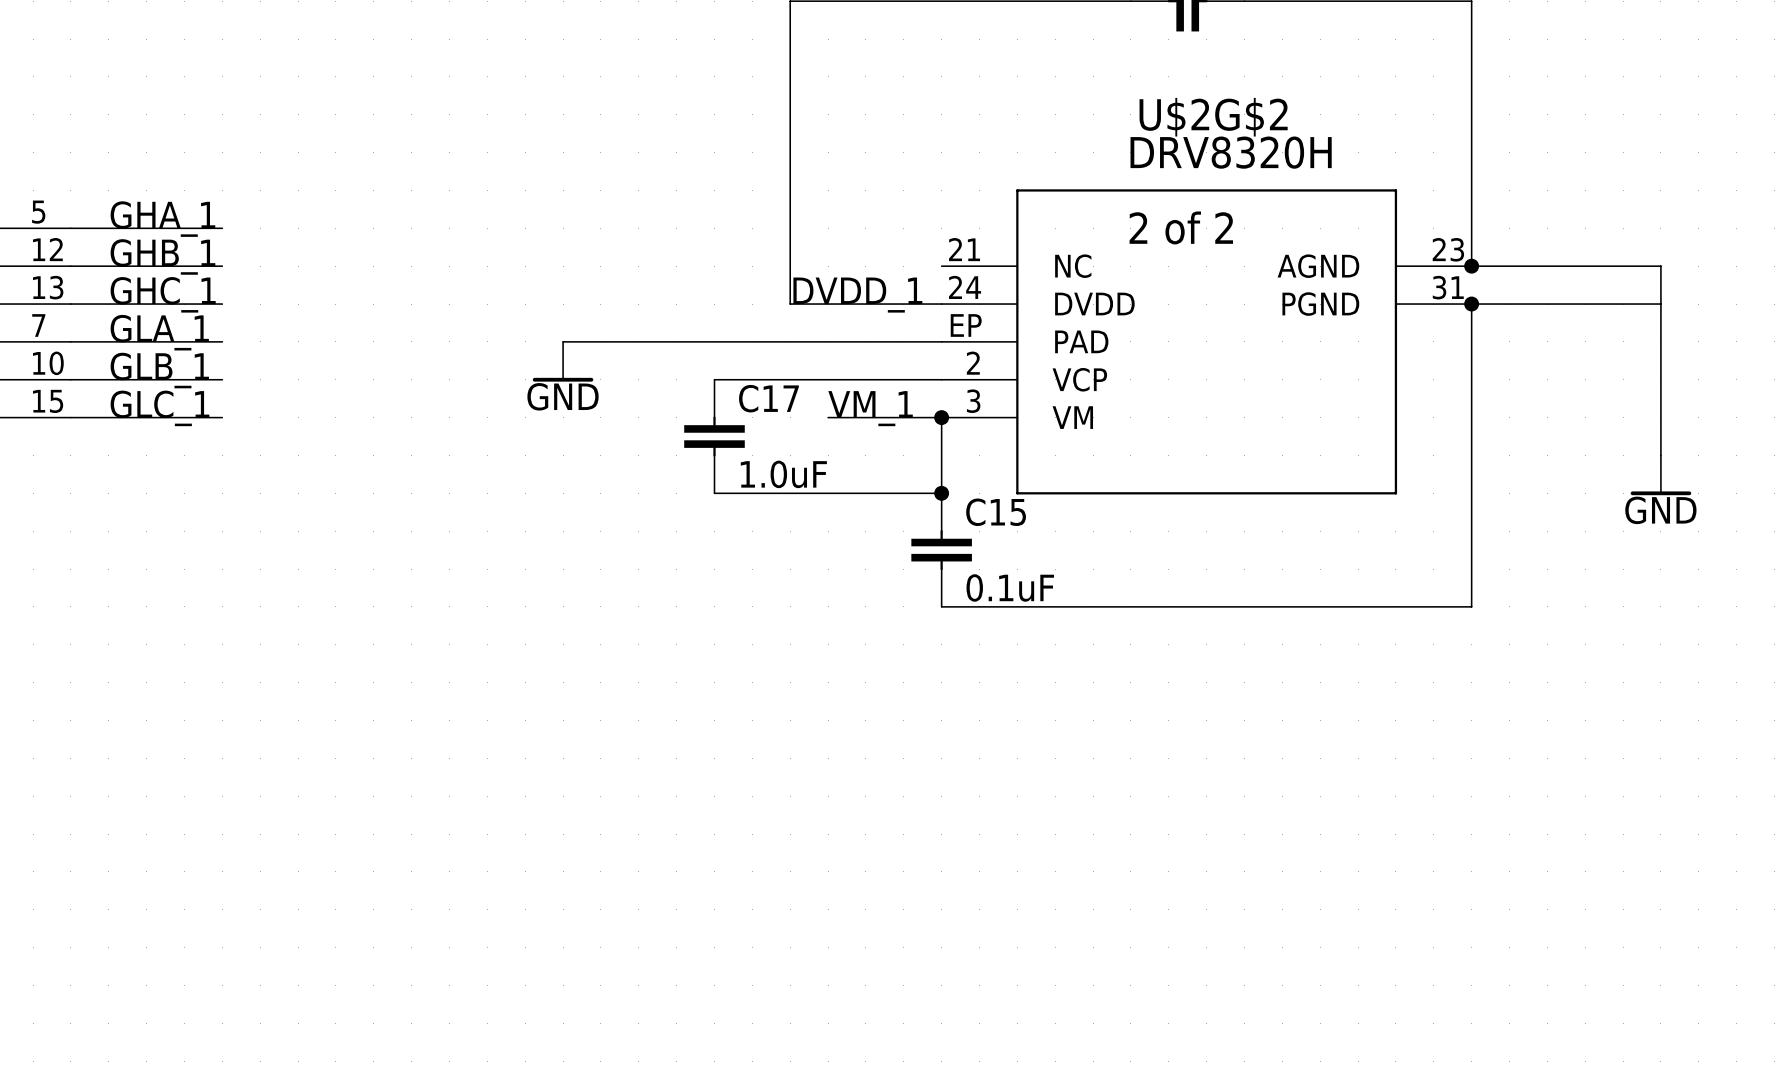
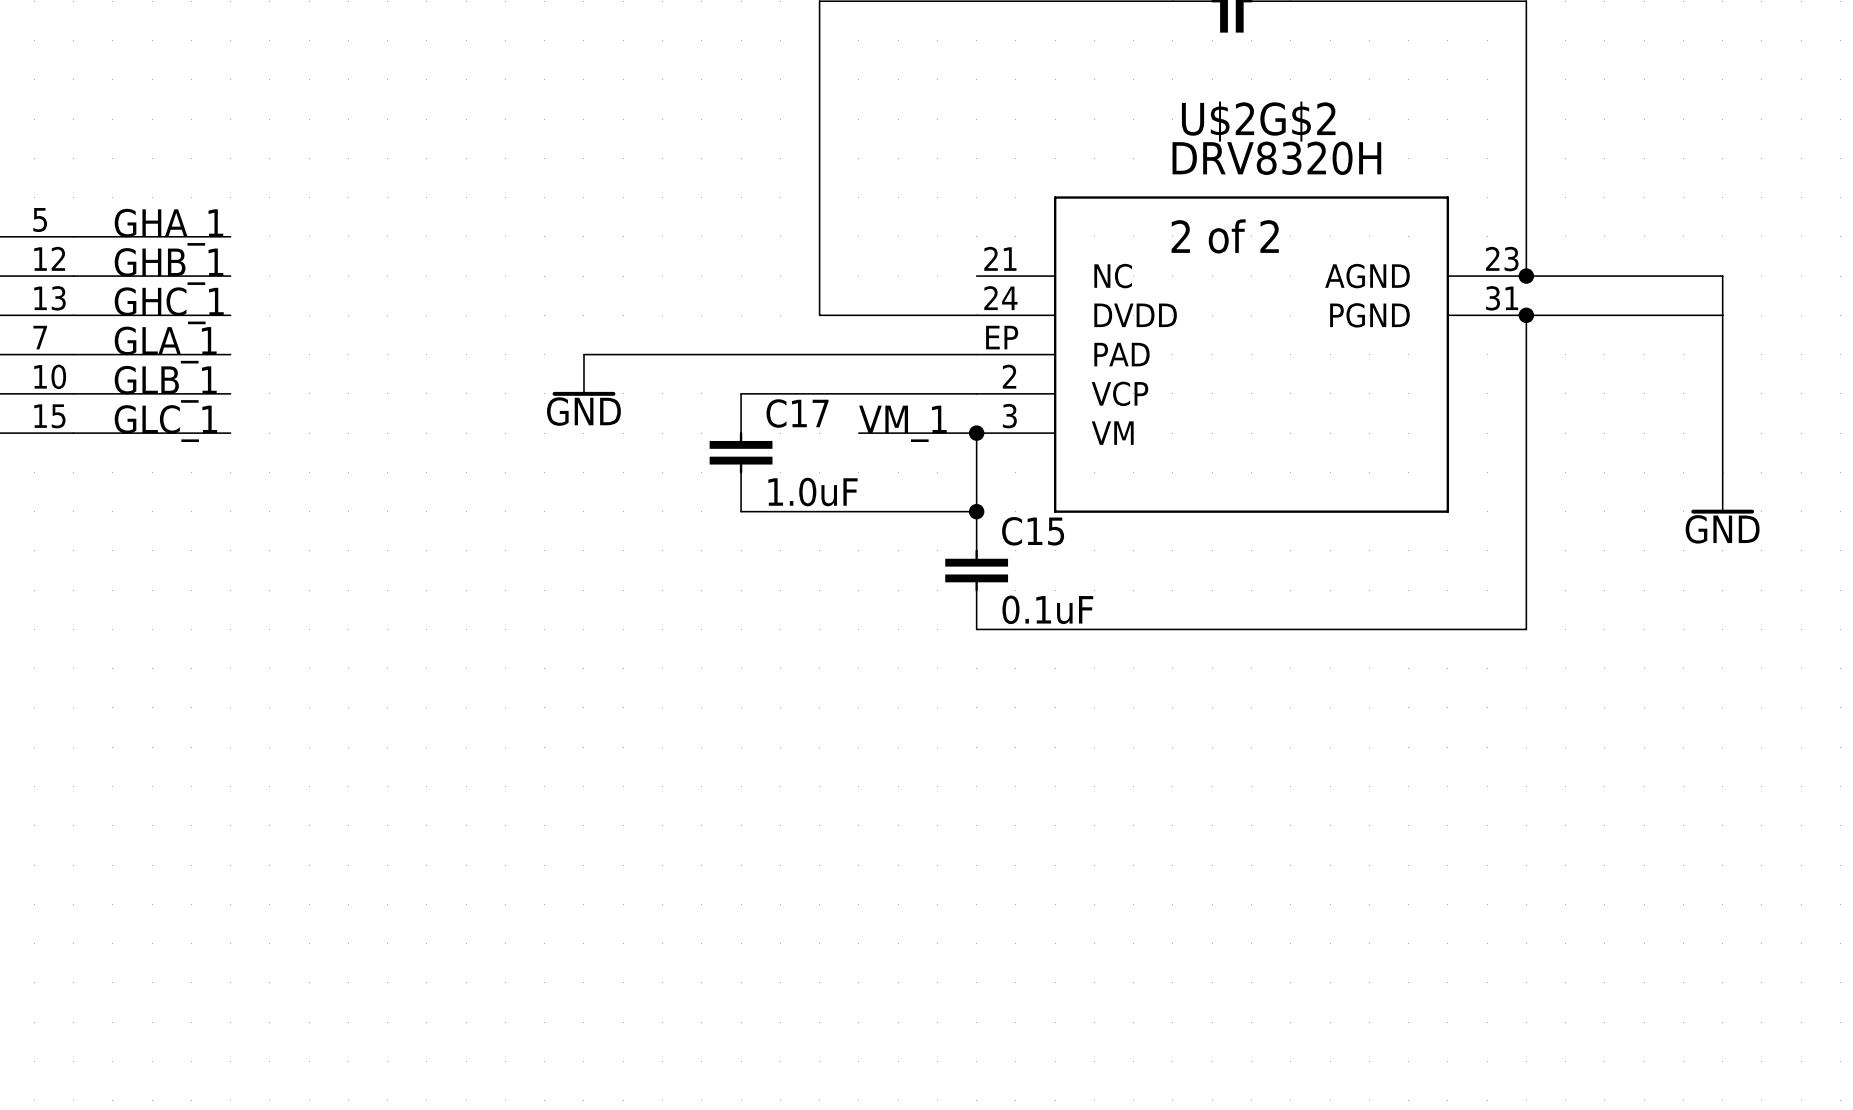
label: DVDD_1 (857, 295) -> none

